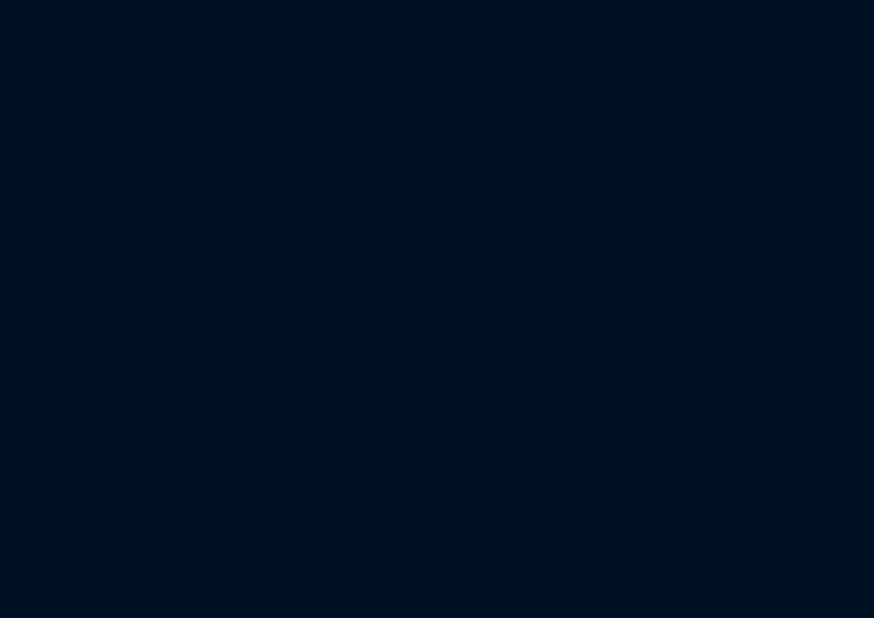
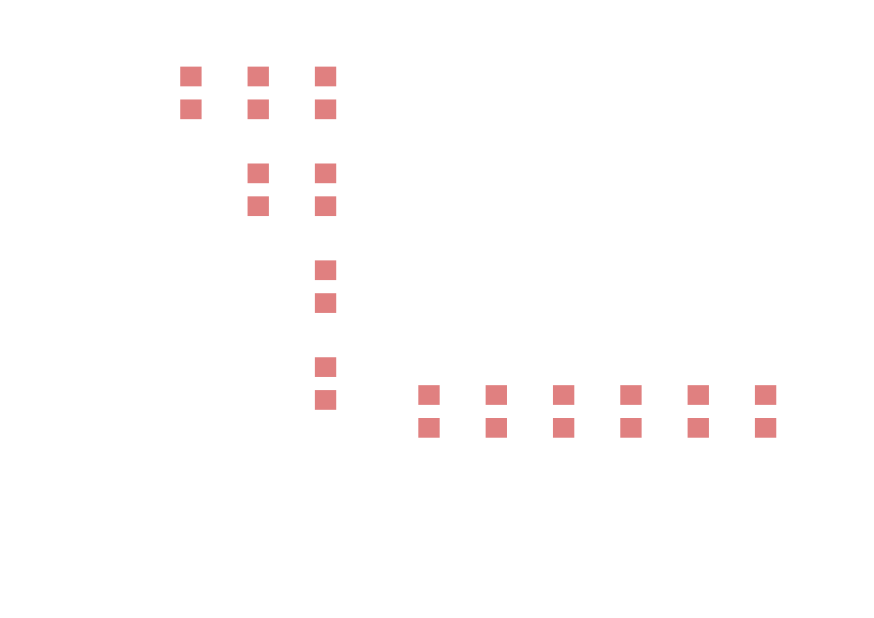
part: none -> (190, 92)
part: none -> (258, 92)
part: none -> (325, 92)
part: none -> (258, 189)
part: none -> (325, 189)
part: none -> (325, 286)
part: none -> (325, 383)
part: none -> (428, 411)
part: none -> (496, 411)
part: none -> (563, 411)
part: none -> (630, 411)
part: none -> (698, 411)
part: none -> (765, 411)

